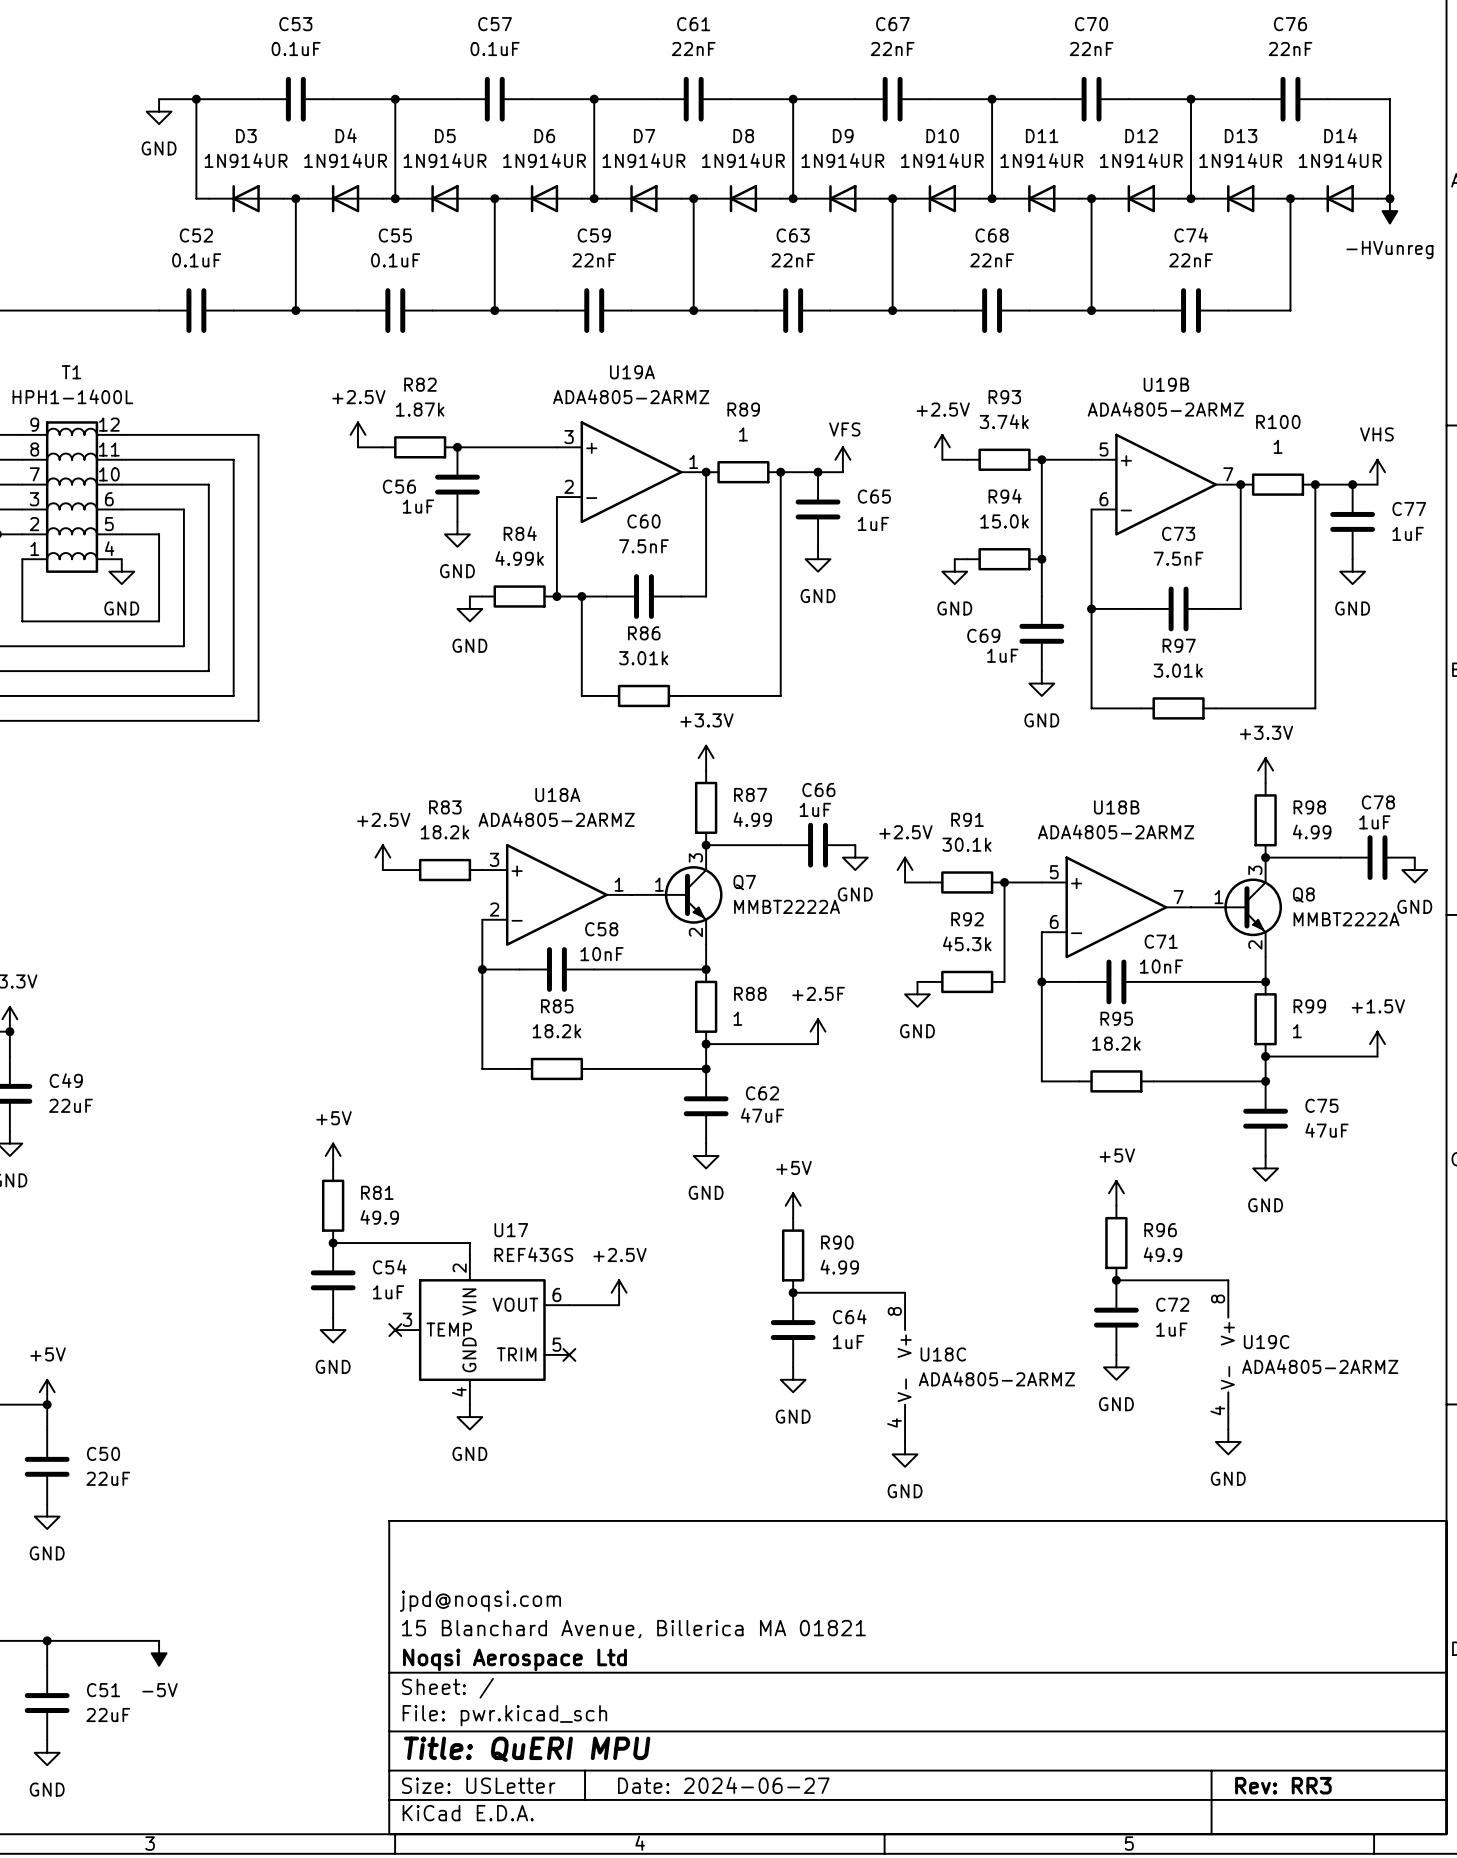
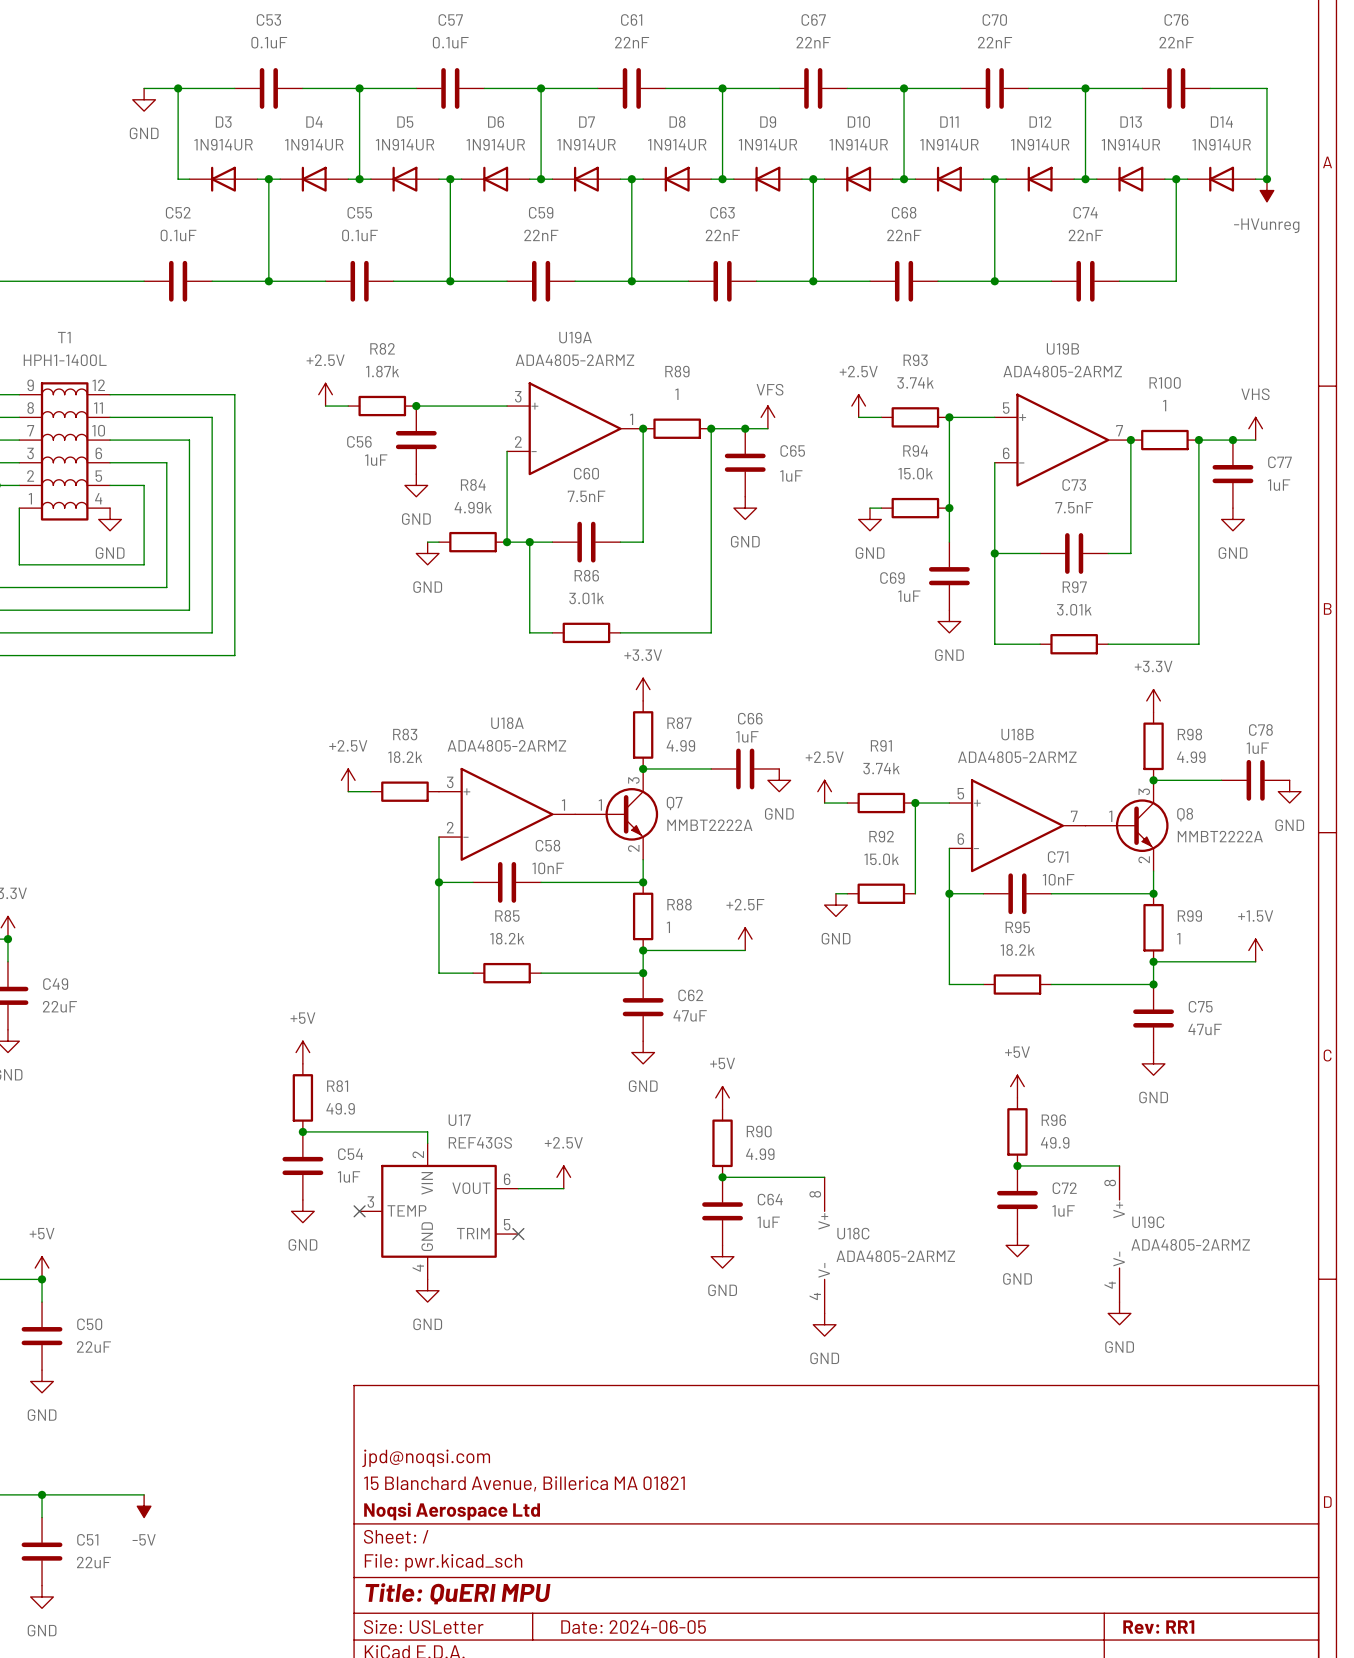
R91 value: 30.1k (966, 844) -> 3.74k (881, 768)
R92 value: 45.3k (967, 943) -> 15.0k (881, 859)
title block: Date: 2024-06-27 (723, 1785) -> Date: 2024-06-05 (633, 1627)
title block: Rev: RR3 (1283, 1785) -> Rev: RR1 (1158, 1627)

